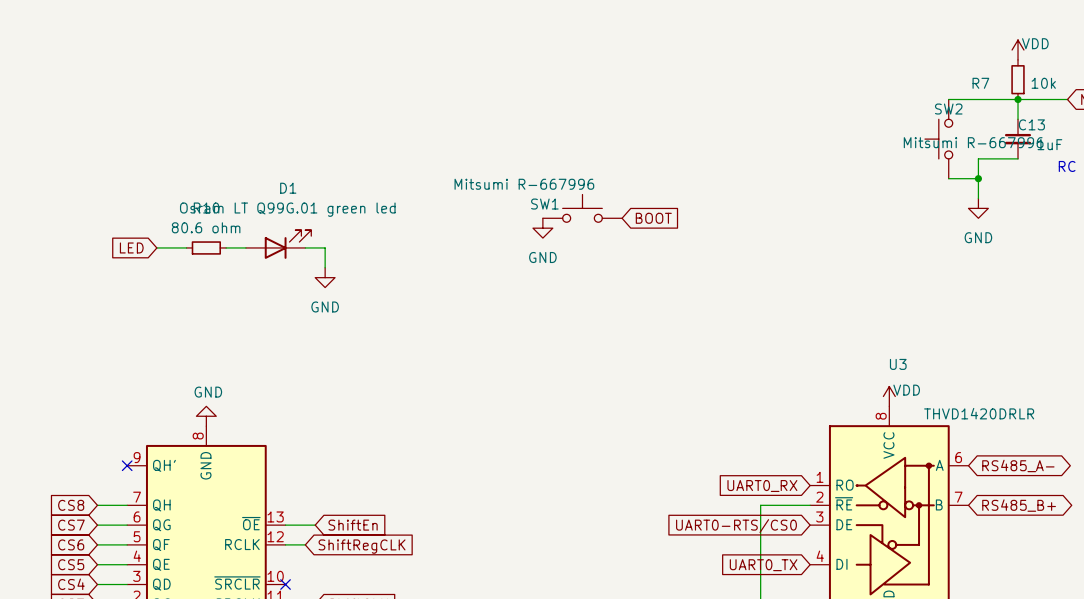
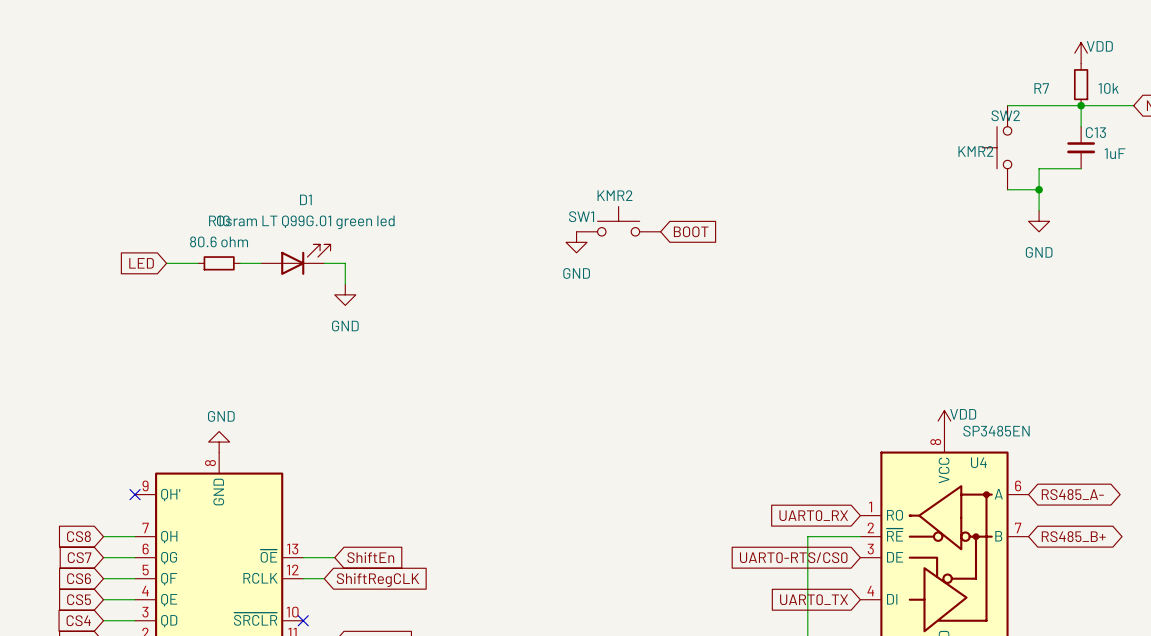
SW2 value: Mitsumi R-667996 (973, 142) -> KMR2 (975, 151)
SW1 value: Mitsumi R-667996 (524, 184) -> KMR2 (615, 195)
U3 name: U3 (898, 364) -> U4 (978, 462)
U3 value: THVD1420DRLR (979, 413) -> SP3485EN (996, 431)

